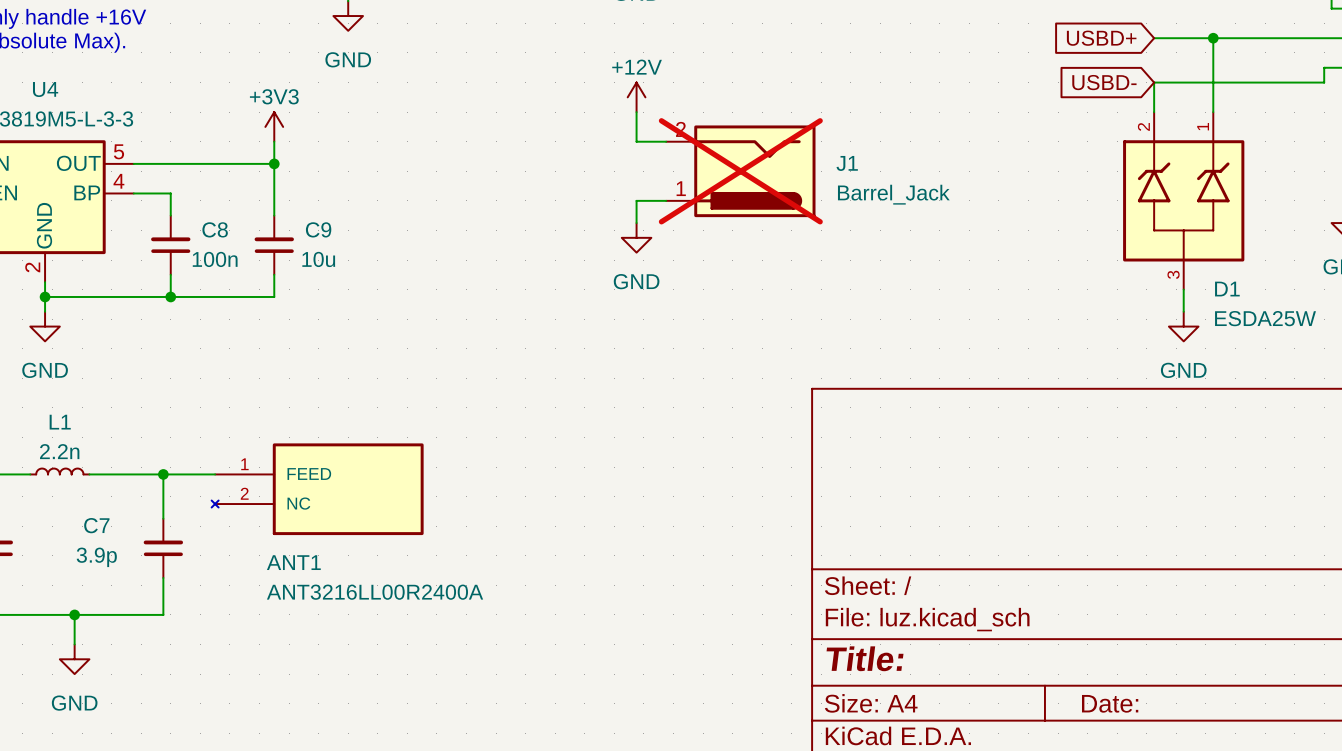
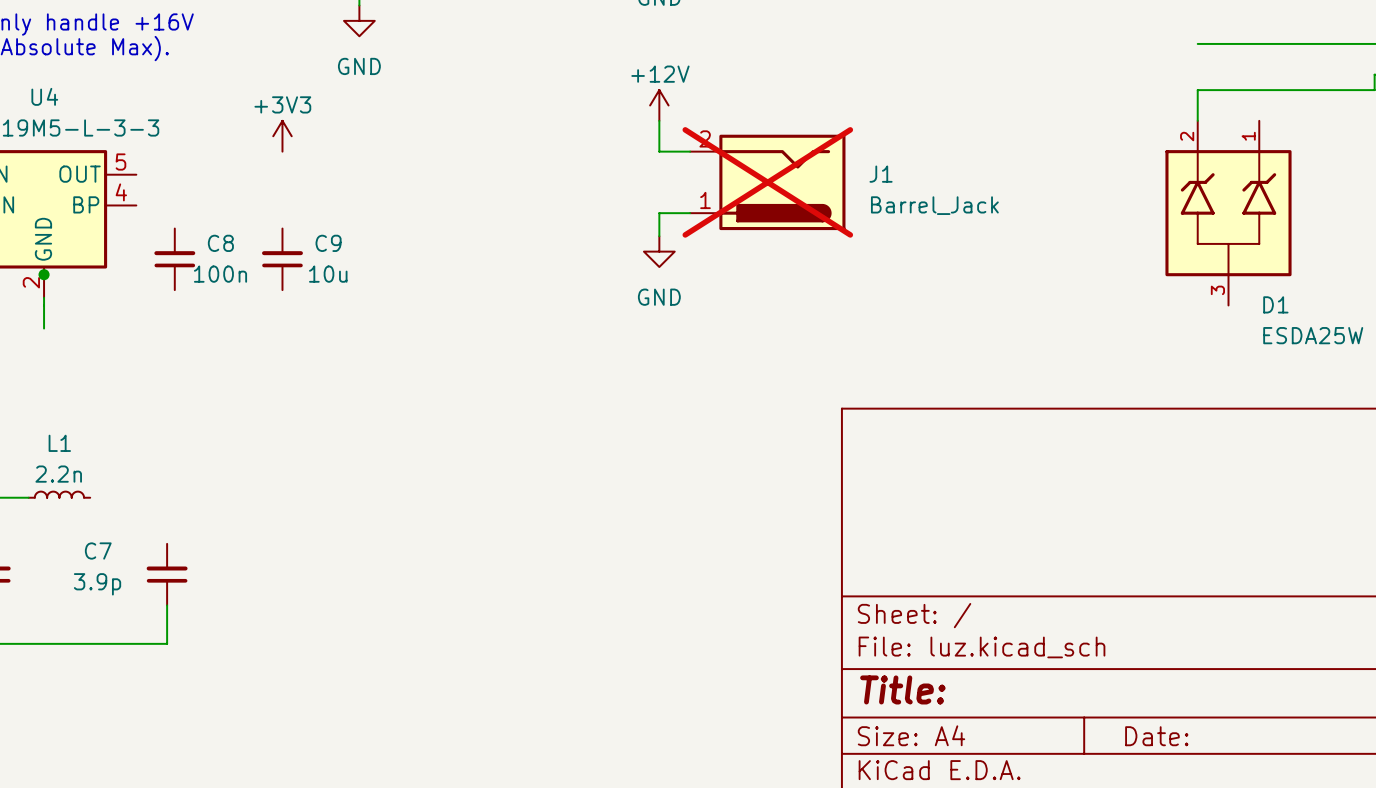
global label: USBD+ (1101, 38) -> none
wire: (1213, 38) (1213, 112) -> none
junction: (1213, 38) -> none
global label: USBD- (1104, 82) -> none
wire: (274, 141) (274, 215) -> none
wire: (133, 163) (274, 163) -> none
junction: (274, 163) -> none
wire: (133, 193) (170, 193) (170, 215) -> none
wire: (170, 274) (170, 296) -> none
wire: (274, 274) (274, 296) (45, 296) -> none
wire: (1183, 289) (1183, 311) -> none
junction position: (45, 296) -> (44, 274)
junction: (170, 296) -> none
power symbol: GND (45, 326) -> none
power symbol: GND (1183, 326) -> none
wire: (89, 474) (215, 474) -> none
wire: (163, 474) (163, 518) -> none
junction: (163, 474) -> none
ANT1: ANT3216LL00R2400A (317, 489) -> none
wire: (74, 614) (74, 644) -> none
junction: (74, 614) -> none
power symbol: GND (74, 659) -> none

